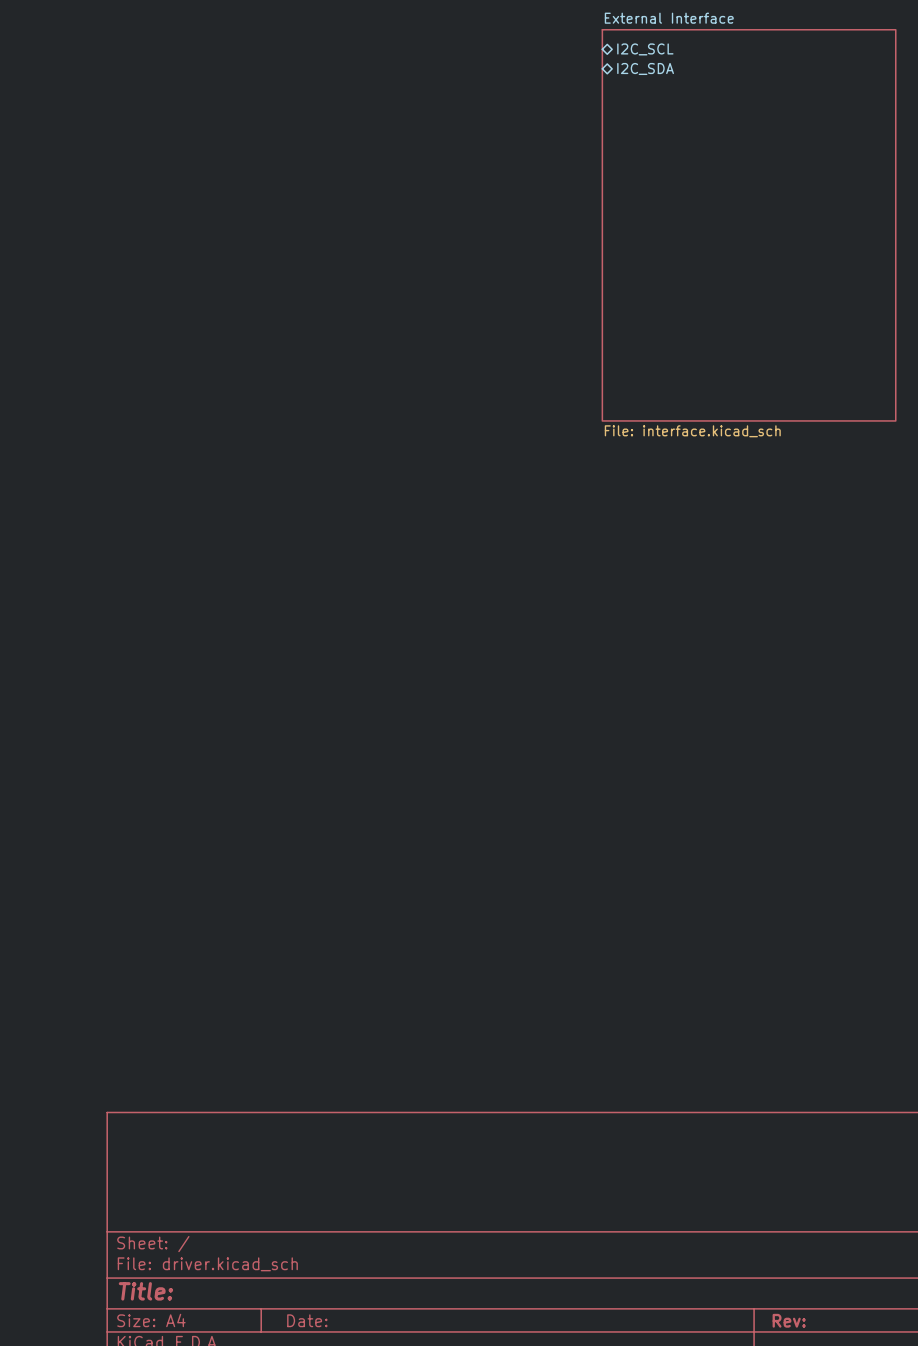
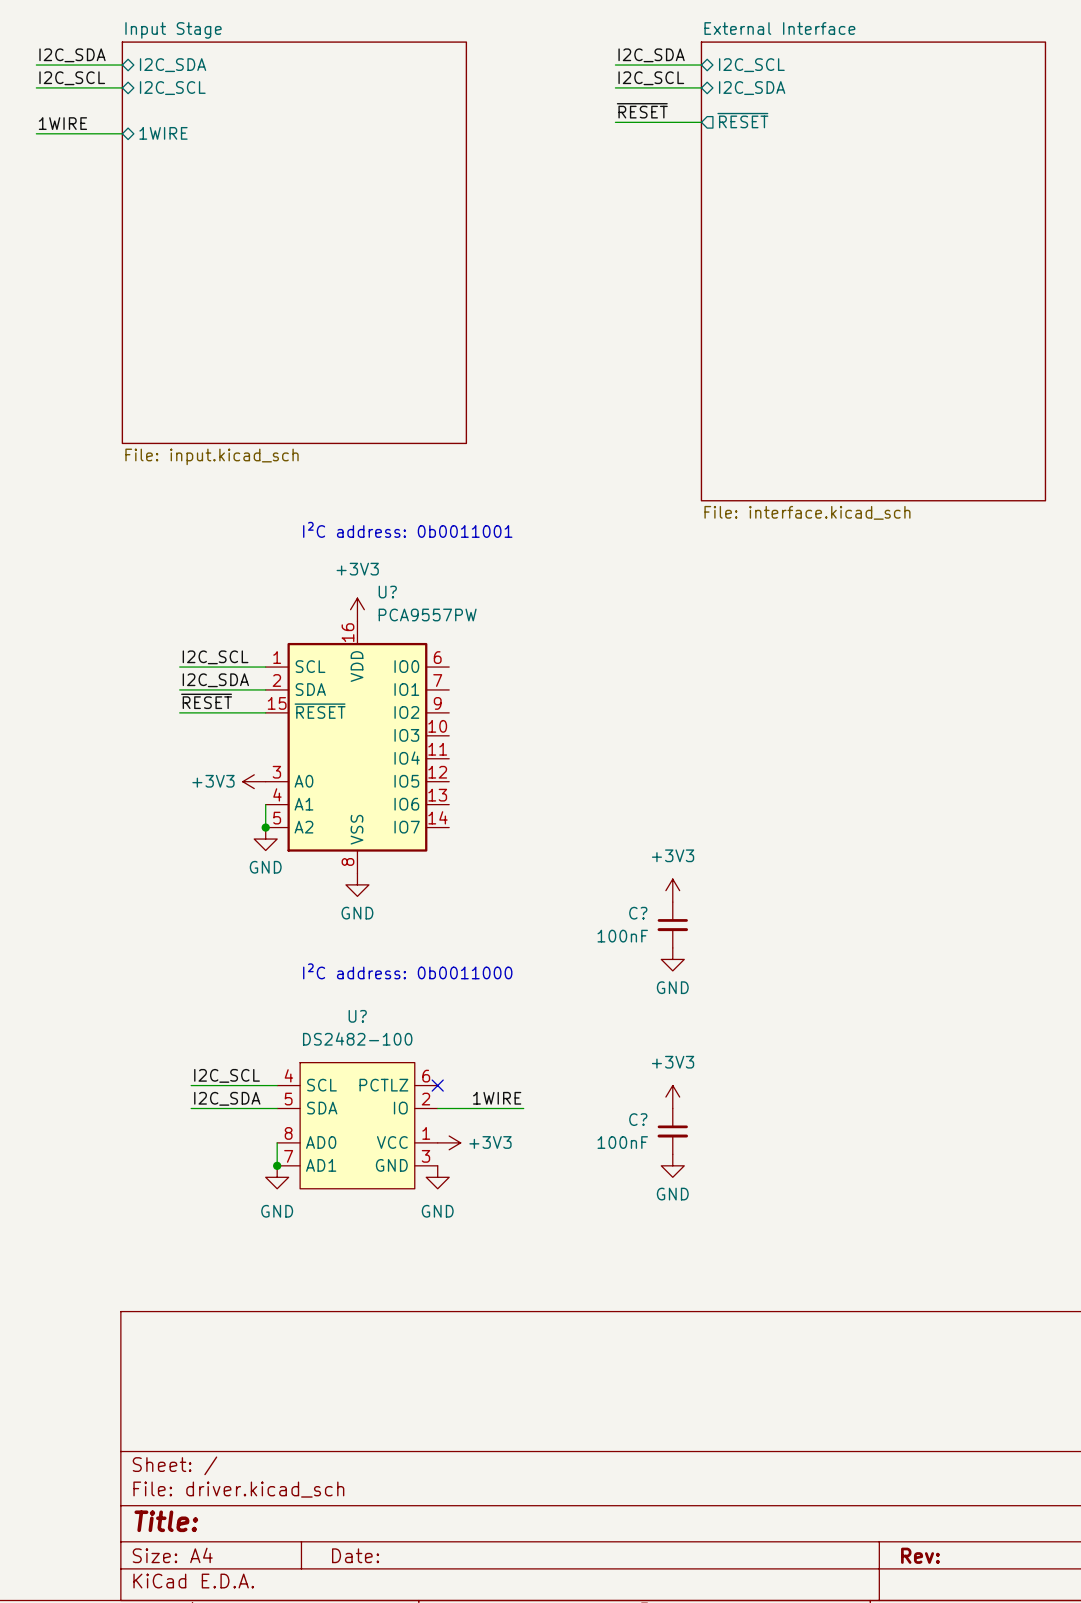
label: none -> I2C_SDA (72, 55)
label: none -> I2C_SDA (651, 55)
wire: none -> (36, 65) (122, 65)
sheet pin: none -> I2C_SDA (173, 65)
wire: none -> (615, 65) (701, 65)
label: none -> I2C_SCL (72, 78)
label: none -> I2C_SCL (651, 78)
wire: none -> (36, 87) (122, 87)
sheet pin: none -> I2C_SCL (172, 88)
wire: none -> (615, 87) (701, 87)
label: none -> ~{RESET} (642, 110)
sheet pin: none -> ~{RESET} (742, 120)
wire: none -> (615, 122) (701, 122)
label: none -> 1WIRE (62, 123)
sheet pin: none -> 1WIRE (163, 133)
wire: none -> (36, 133) (122, 133)
sheet Input Stage: none -> File: input.kicad_sch (294, 242)
text: none -> I²C address: 0b0011001 (407, 529)
power symbol: none -> +3V3 (357, 609)
label: none -> I2C_SCL (215, 657)
wire: none -> (179, 667) (265, 667)
label: none -> I2C_SDA (215, 680)
wire: none -> (179, 689) (265, 689)
label: none -> ~{RESET} (206, 701)
wire: none -> (179, 712) (265, 712)
U?: none -> PCA9557PW (357, 747)
power symbol: none -> +3V3 (254, 781)
wire: none -> (265, 804) (265, 827)
junction: none -> (265, 827)
power symbol: none -> GND (265, 839)
power symbol: none -> GND (357, 884)
power symbol: none -> +3V3 (672, 890)
C?: none -> 100nF (672, 925)
power symbol: none -> GND (672, 959)
text: none -> I²C address: 0b0011000 (407, 971)
label: none -> I2C_SCL (227, 1075)
wire: none -> (191, 1085) (277, 1085)
no-connect mark: none -> (437, 1085)
power symbol: none -> +3V3 (672, 1097)
label: none -> 1WIRE (497, 1098)
label: none -> I2C_SDA (227, 1098)
wire: none -> (191, 1108) (277, 1108)
wire: none -> (437, 1108) (523, 1108)
U?: none -> DS2482-100 (357, 1125)
C?: none -> 100nF (672, 1131)
wire: none -> (277, 1142) (277, 1165)
power symbol: none -> +3V3 (449, 1142)
junction: none -> (277, 1165)
power symbol: none -> GND (672, 1165)
power symbol: none -> GND (277, 1177)
power symbol: none -> GND (437, 1177)

